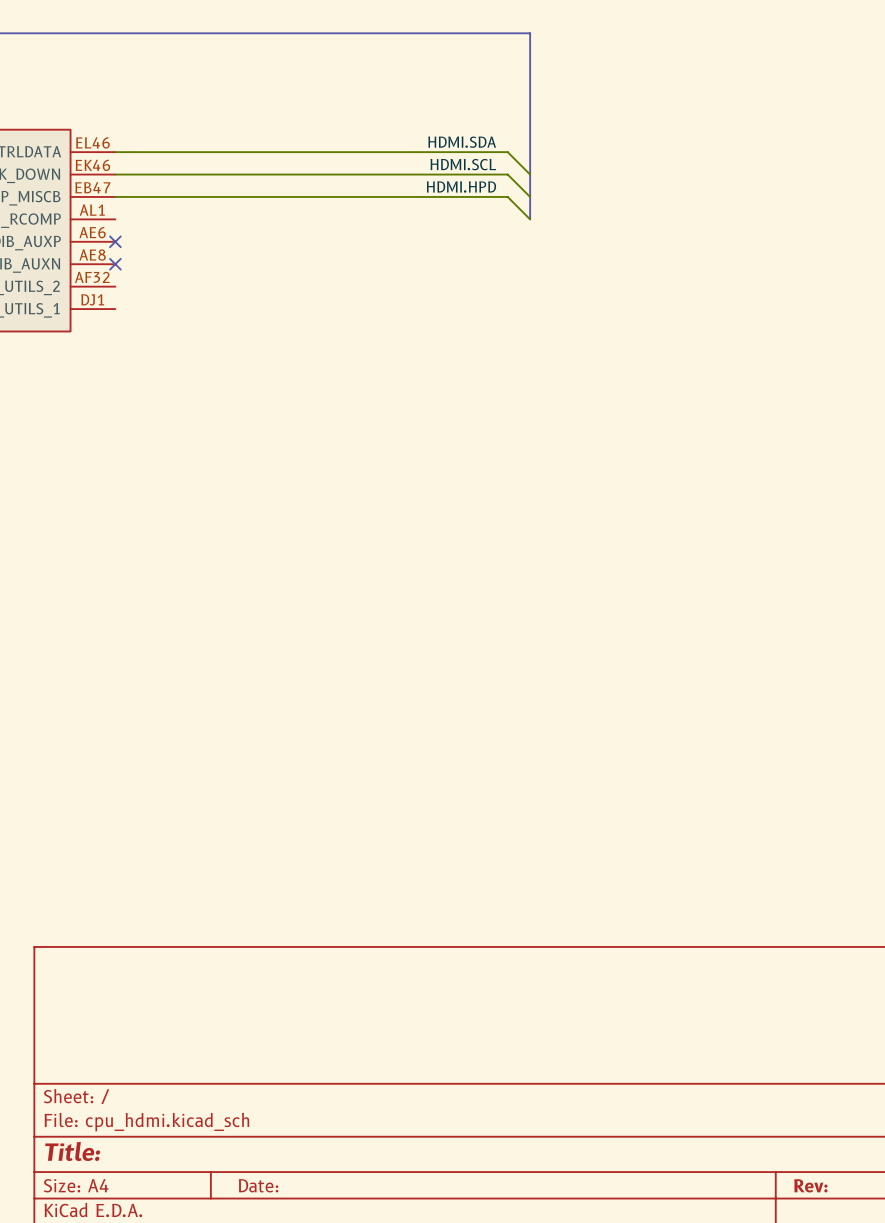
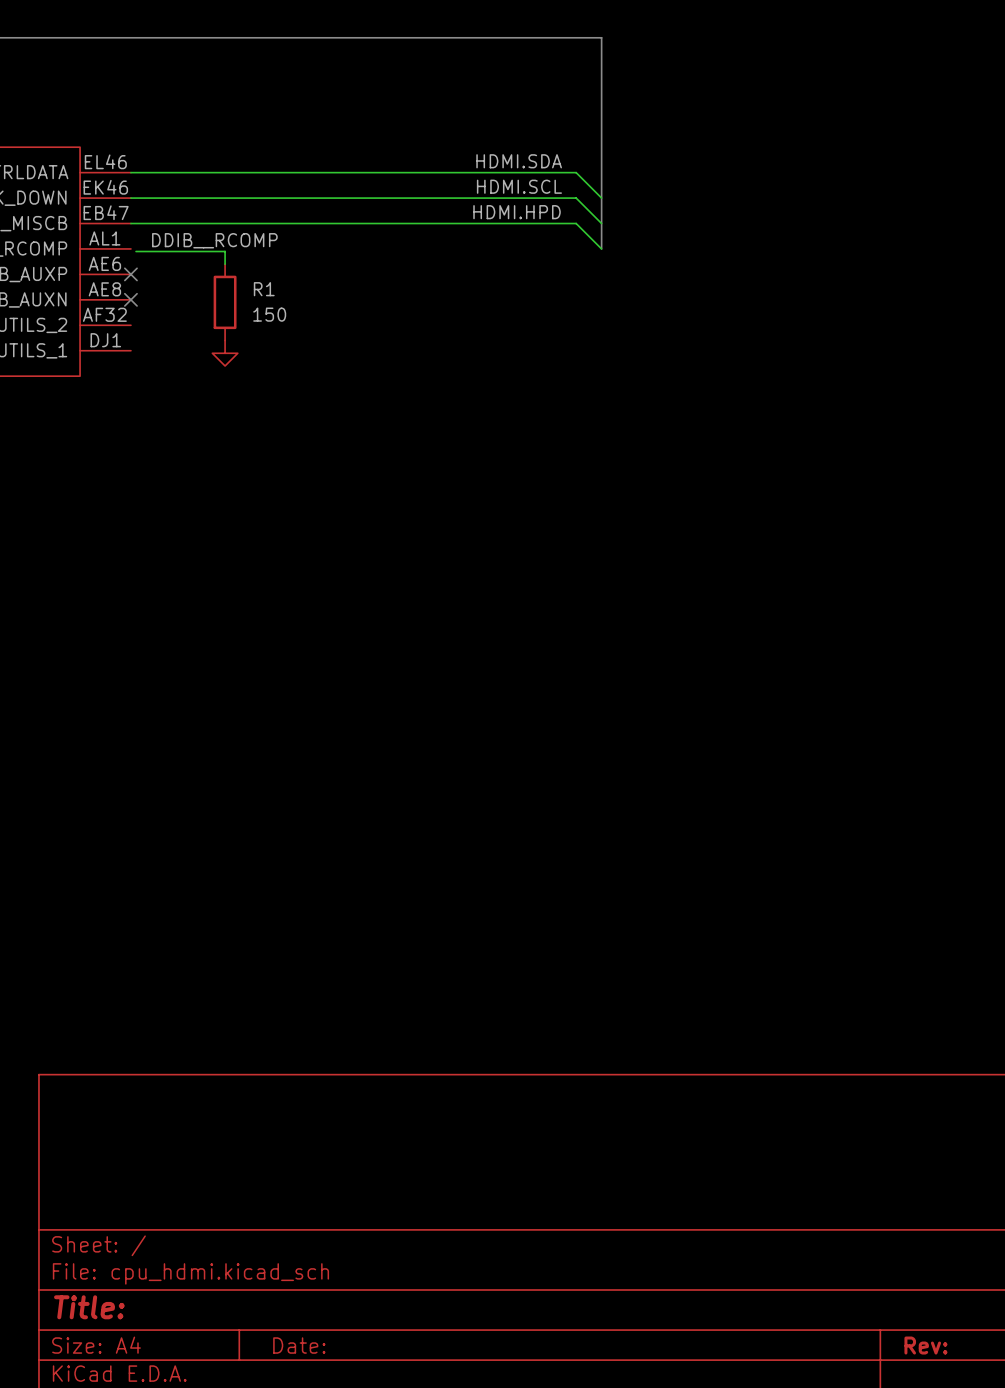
label: none -> DDIB__RCOMP (214, 240)
wire: none -> (136, 251) (225, 251) (225, 264)
R1: none -> 150 (225, 302)
power symbol: none -> (225, 353)

